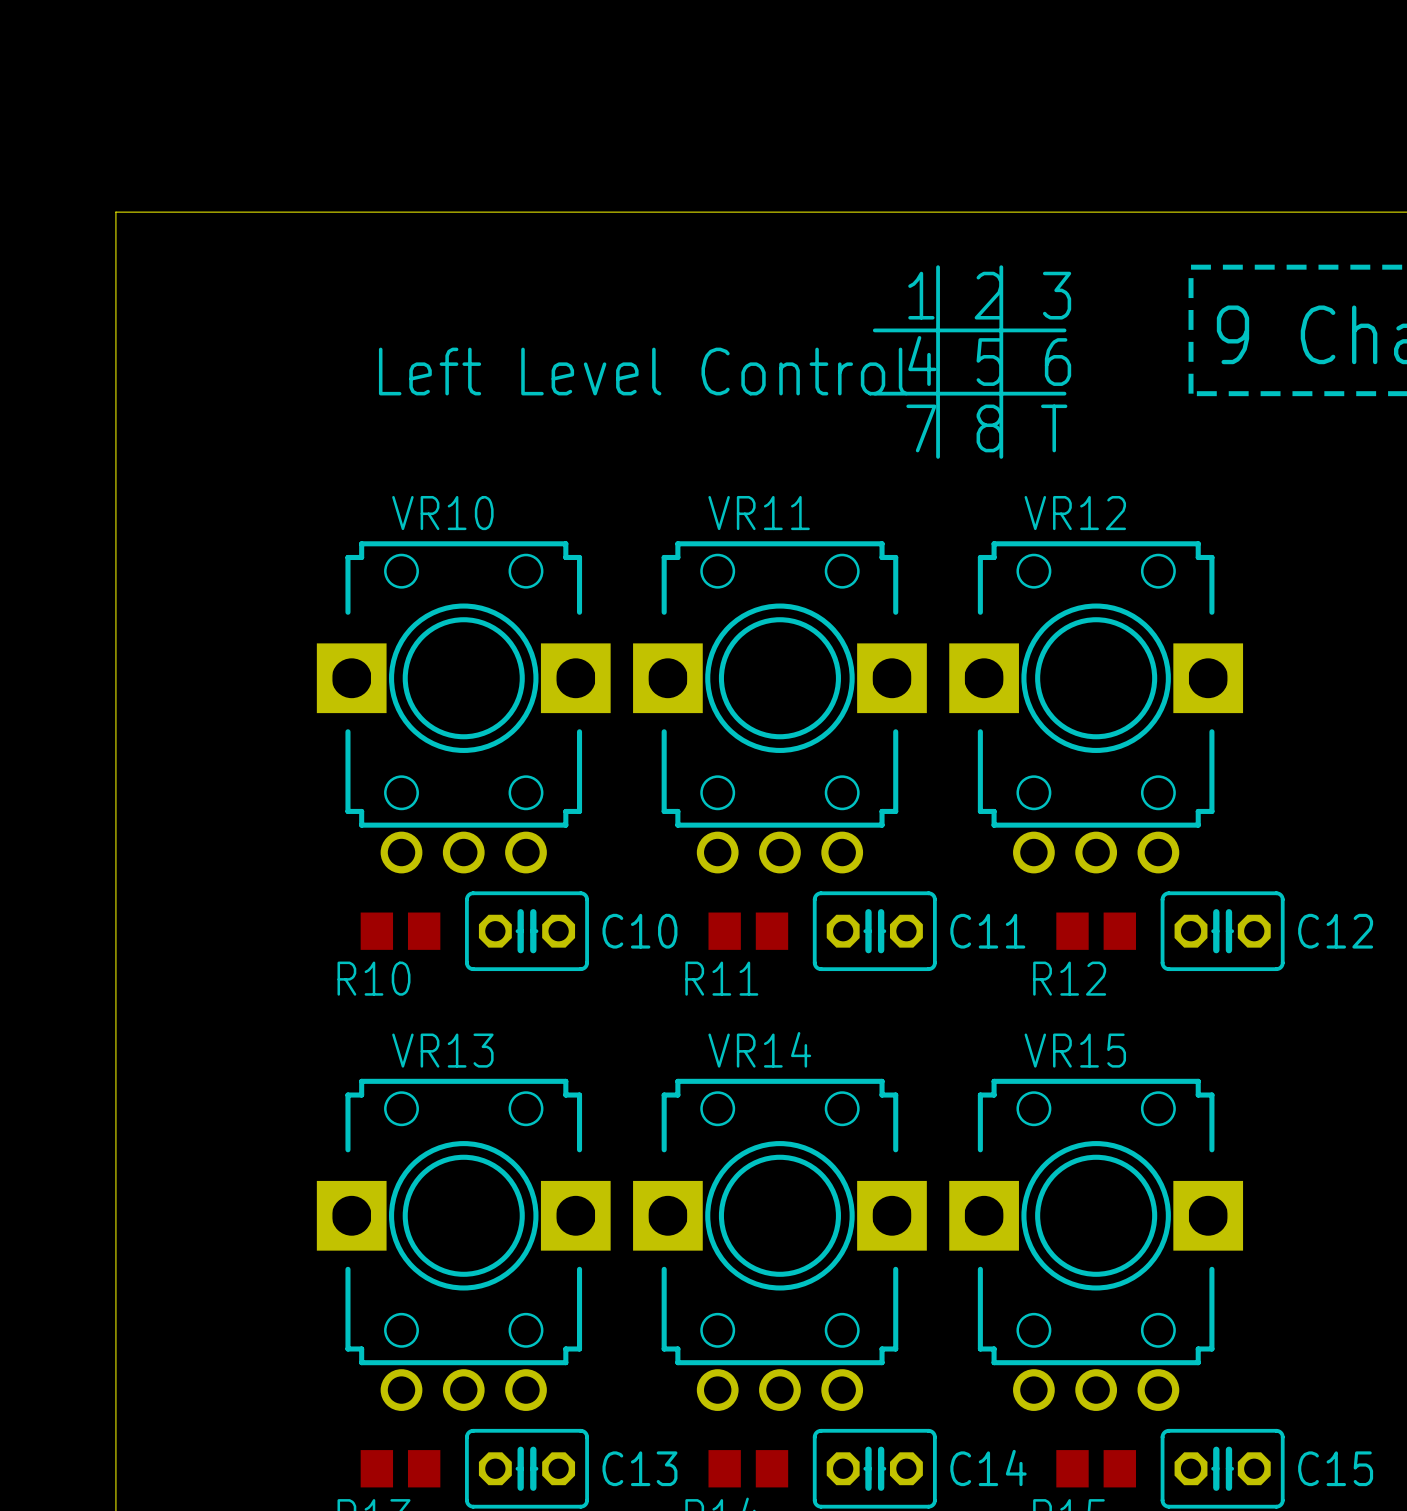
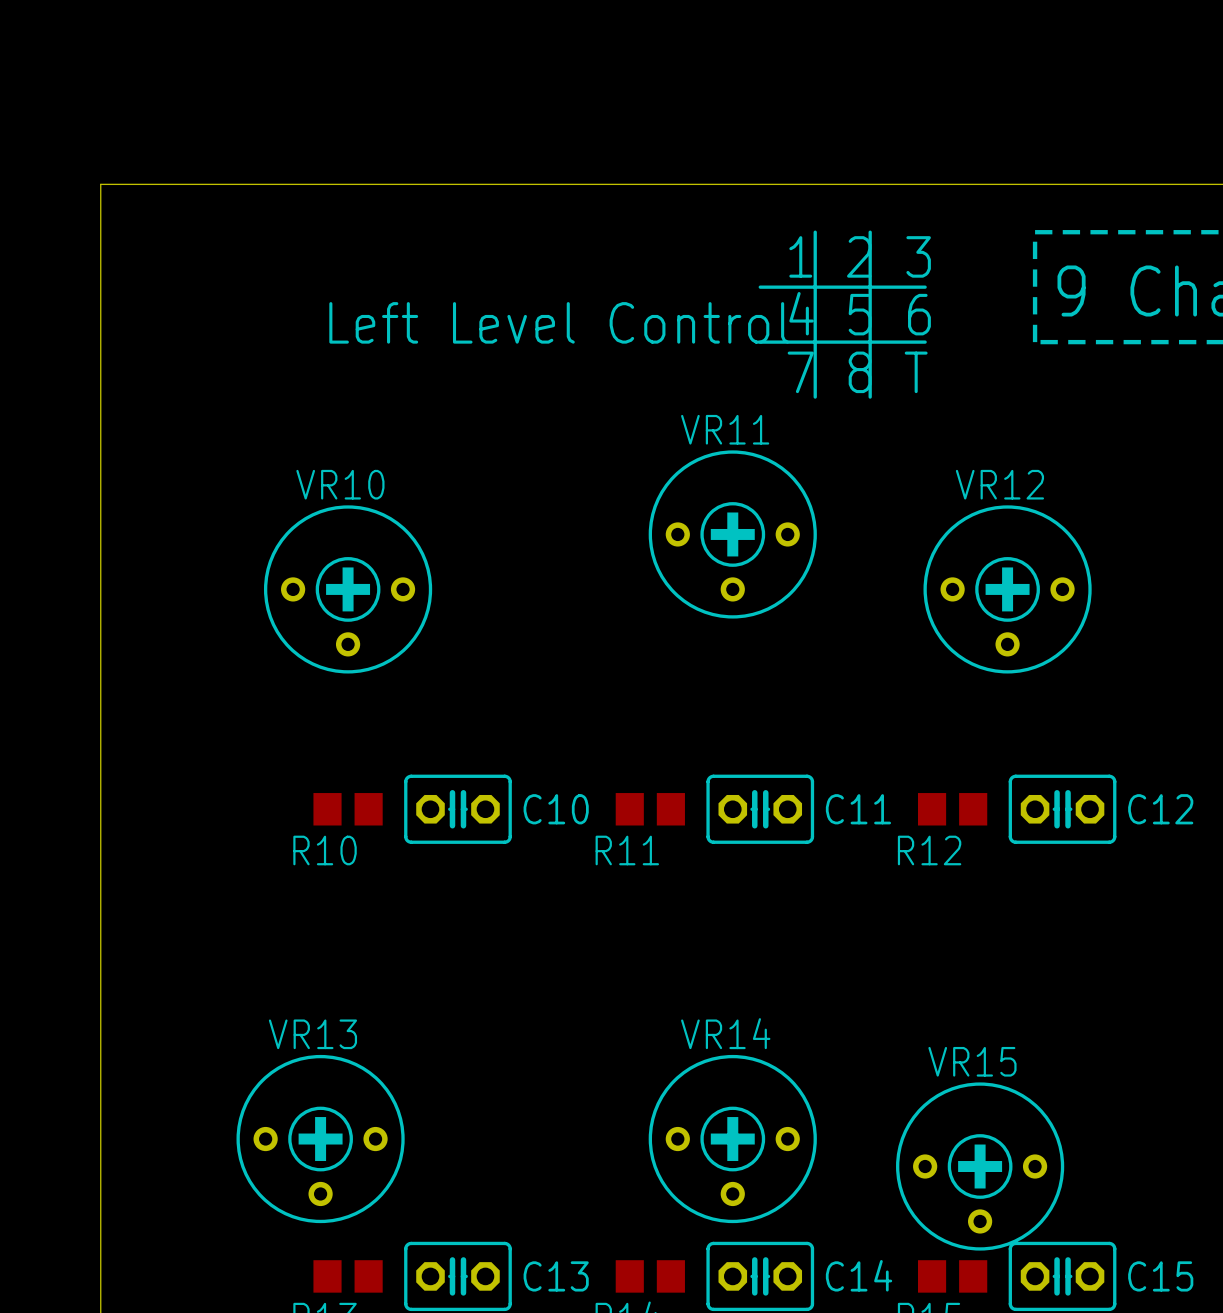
VR10 name position: VR10 (442, 513) -> VR10 (340, 484)
VR11 name position: VR11 (759, 513) -> VR11 (725, 429)
VR12 name position: VR12 (1075, 513) -> VR12 (999, 484)
VR10 footprint: [316, 541, 611, 874] -> [263, 505, 433, 674]
VR11 footprint: [633, 541, 927, 874] -> [648, 450, 817, 619]
VR12 footprint: [949, 541, 1244, 874] -> [923, 505, 1092, 674]
VR14 name position: VR14 (759, 1049) -> VR14 (725, 1033)
VR13 name position: VR13 (442, 1050) -> VR13 (312, 1034)
VR15 name position: VR15 (1075, 1050) -> VR15 (972, 1061)
VR13 footprint: [316, 1078, 611, 1411] -> [236, 1054, 405, 1224]
VR14 footprint: [633, 1078, 927, 1411] -> [648, 1054, 817, 1224]
VR15 footprint: [949, 1078, 1244, 1411] -> [896, 1082, 1065, 1251]

